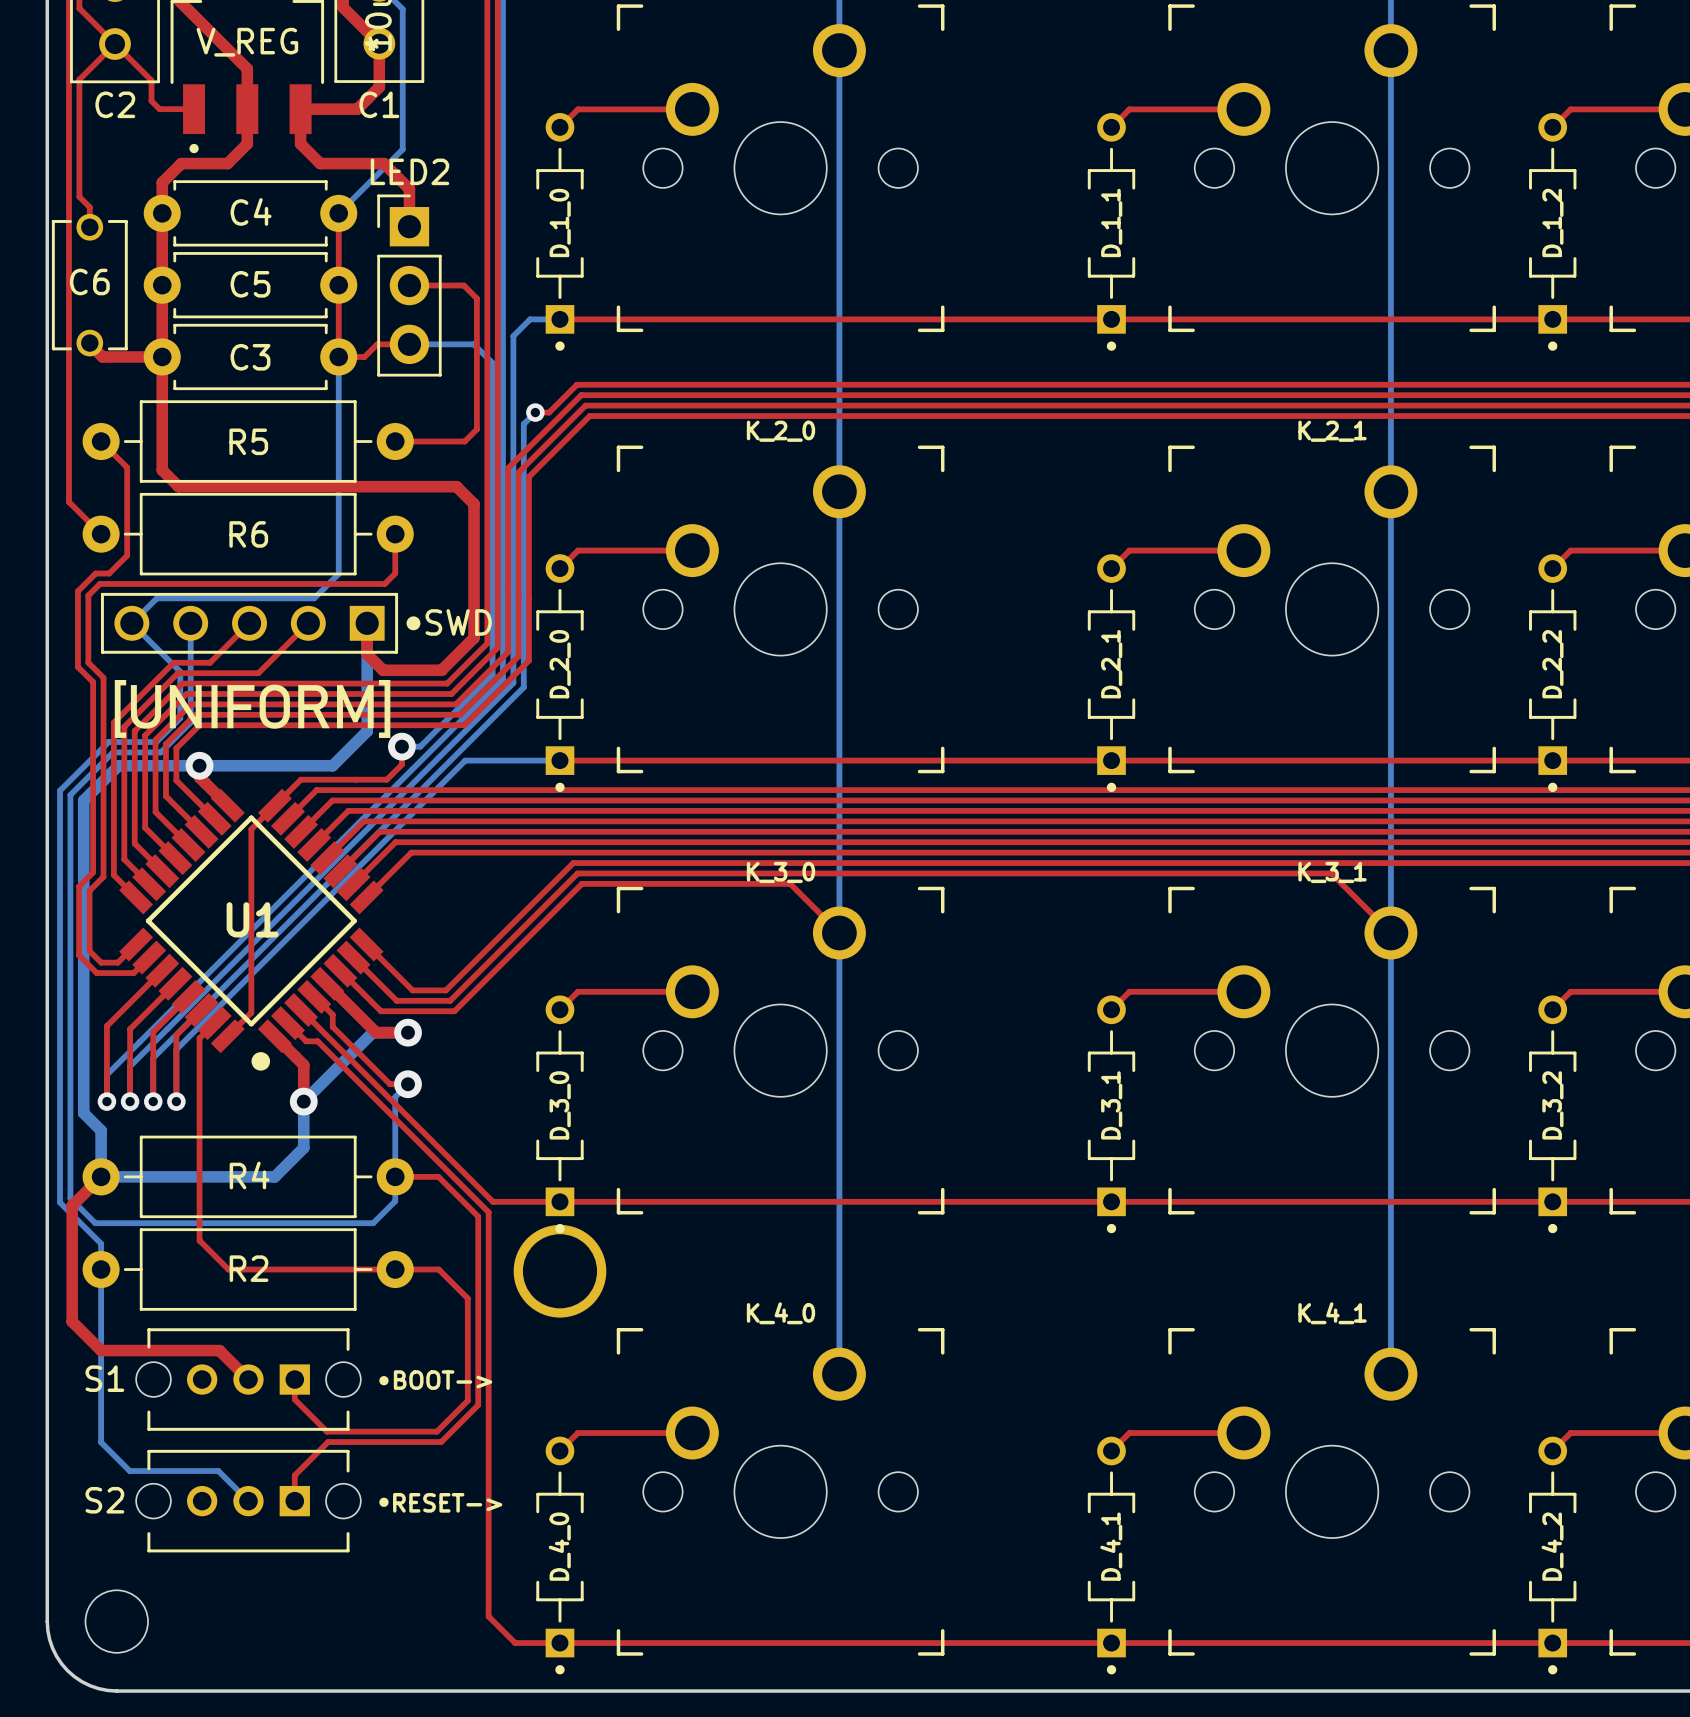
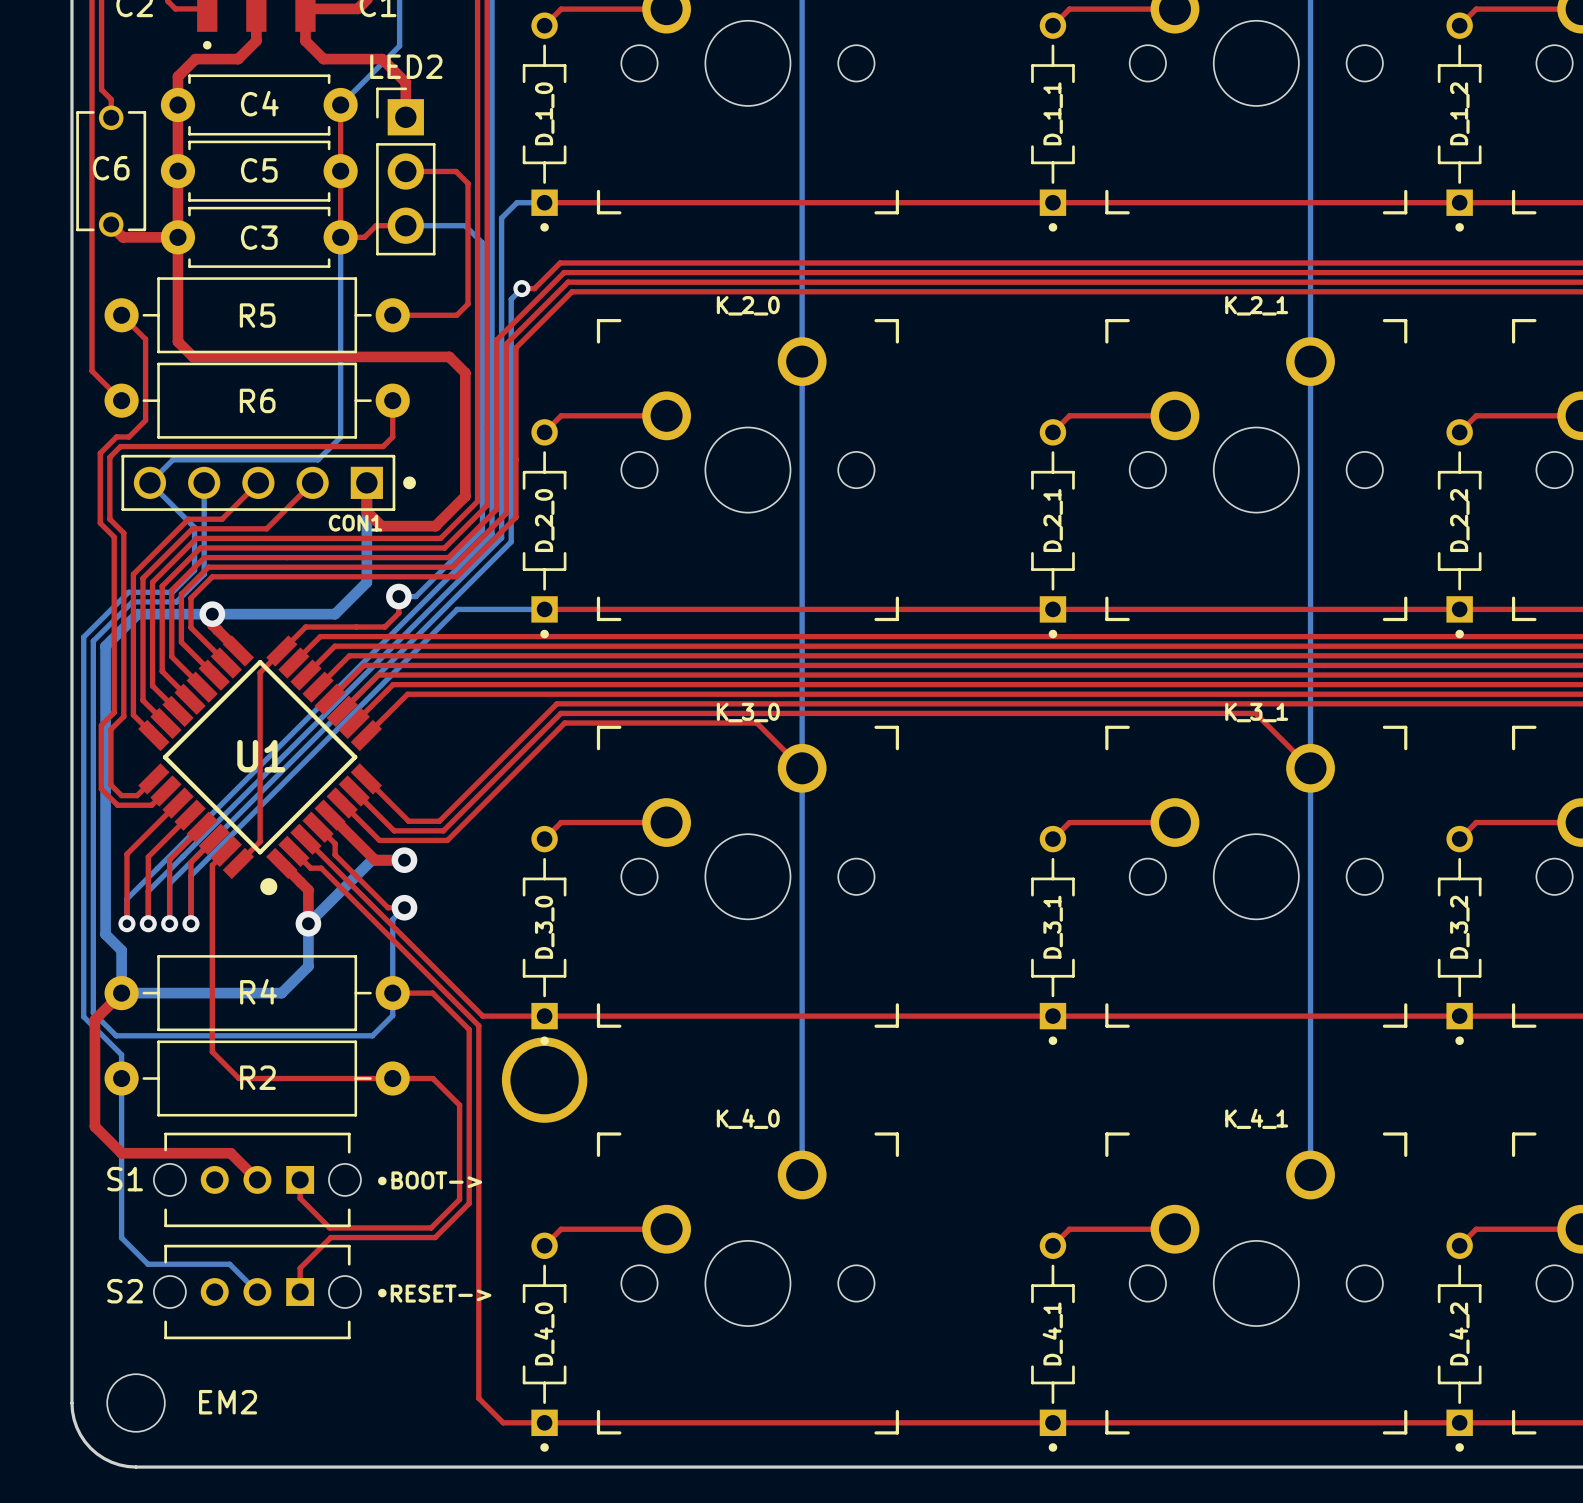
SWD name: SWD (458, 622) -> CON1 (355, 523)
drawing: [114, 680, 391, 738] -> none
EM2 name: none -> EM2 (228, 1402)

